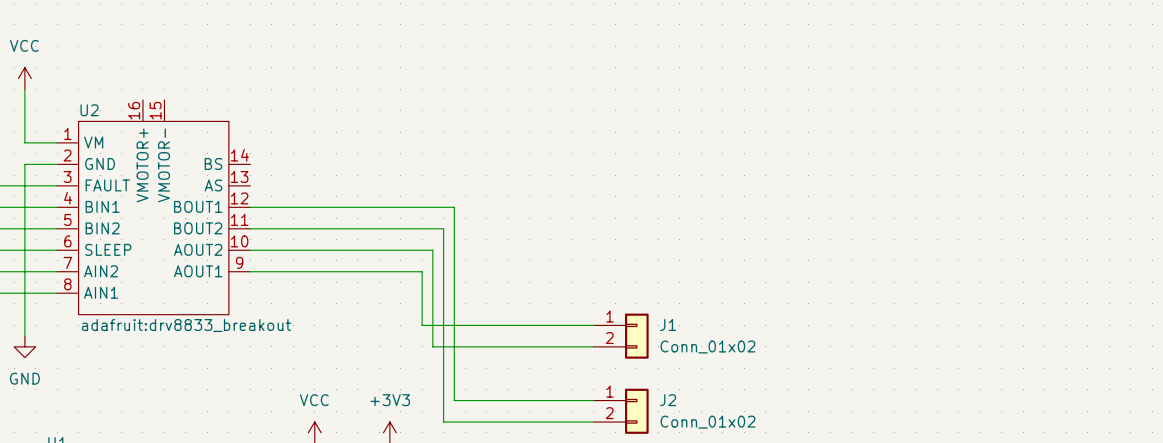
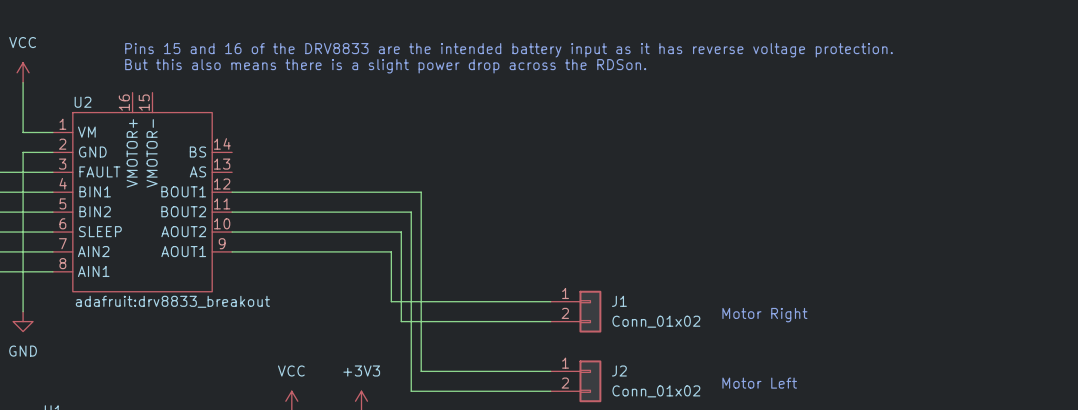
text: none -> Pins 15 and 16 of the DRV8833 are the intended battery input as it has reverse voltage protection. (508, 50)
text: none -> But this also means there is a slight power drop across the RDSon. (385, 66)
text: none -> Motor Right (764, 315)
text: none -> Motor Left (759, 383)

